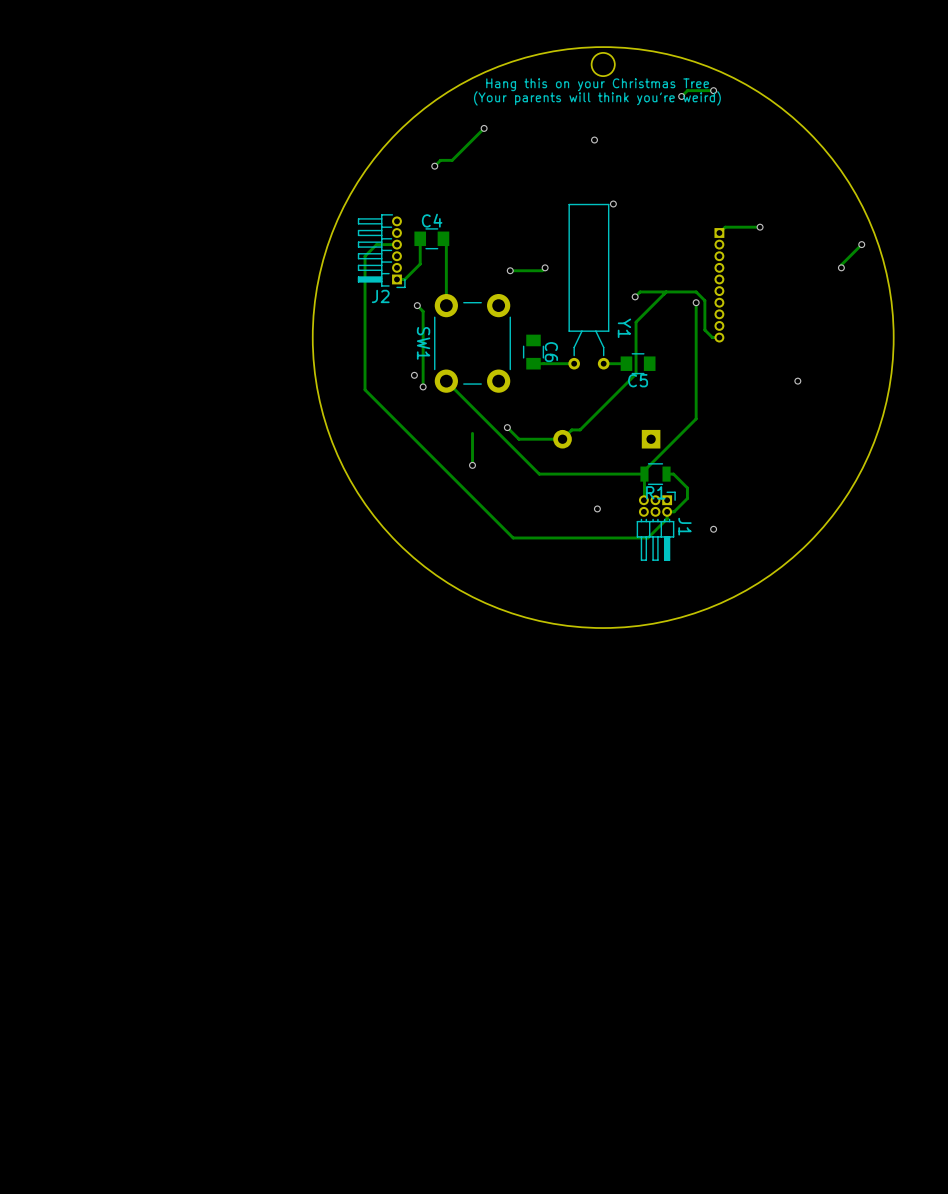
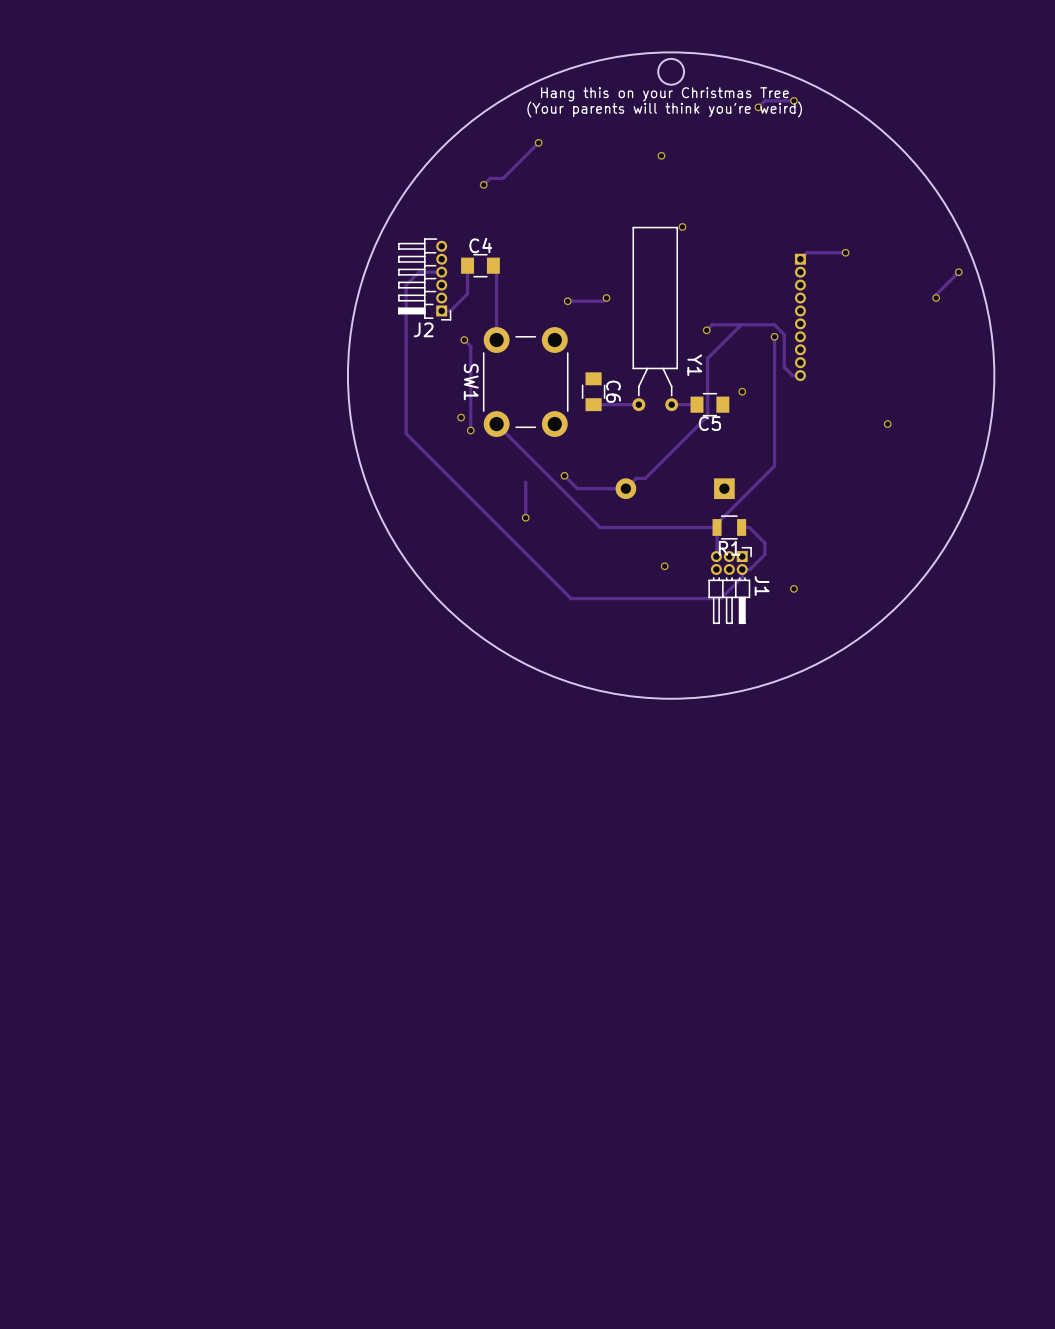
via: none -> (742, 391)

